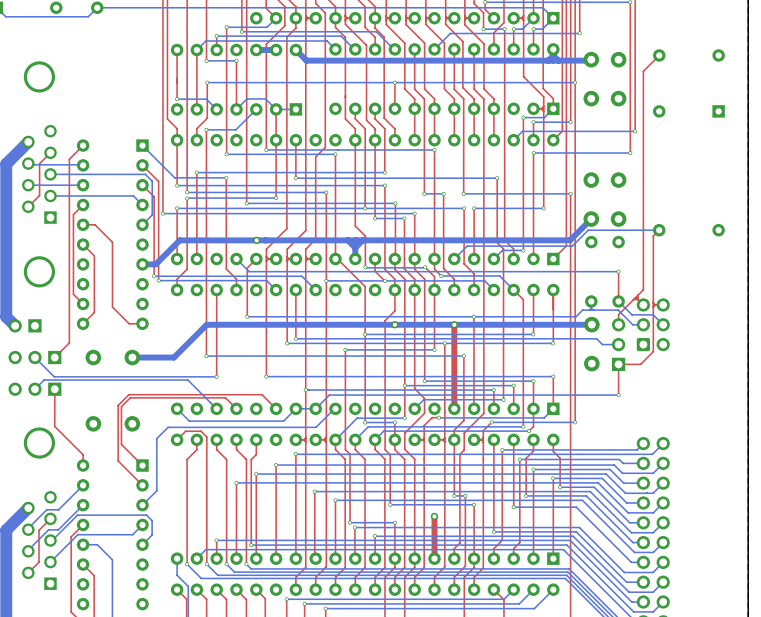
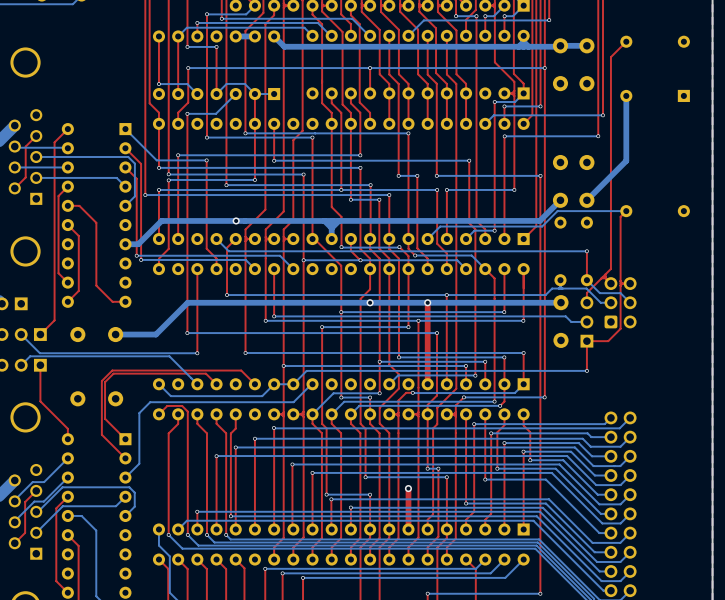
bottom track: none -> (586, 45) (560, 45)
bottom track: none -> (626, 95) (626, 160) (586, 200)

